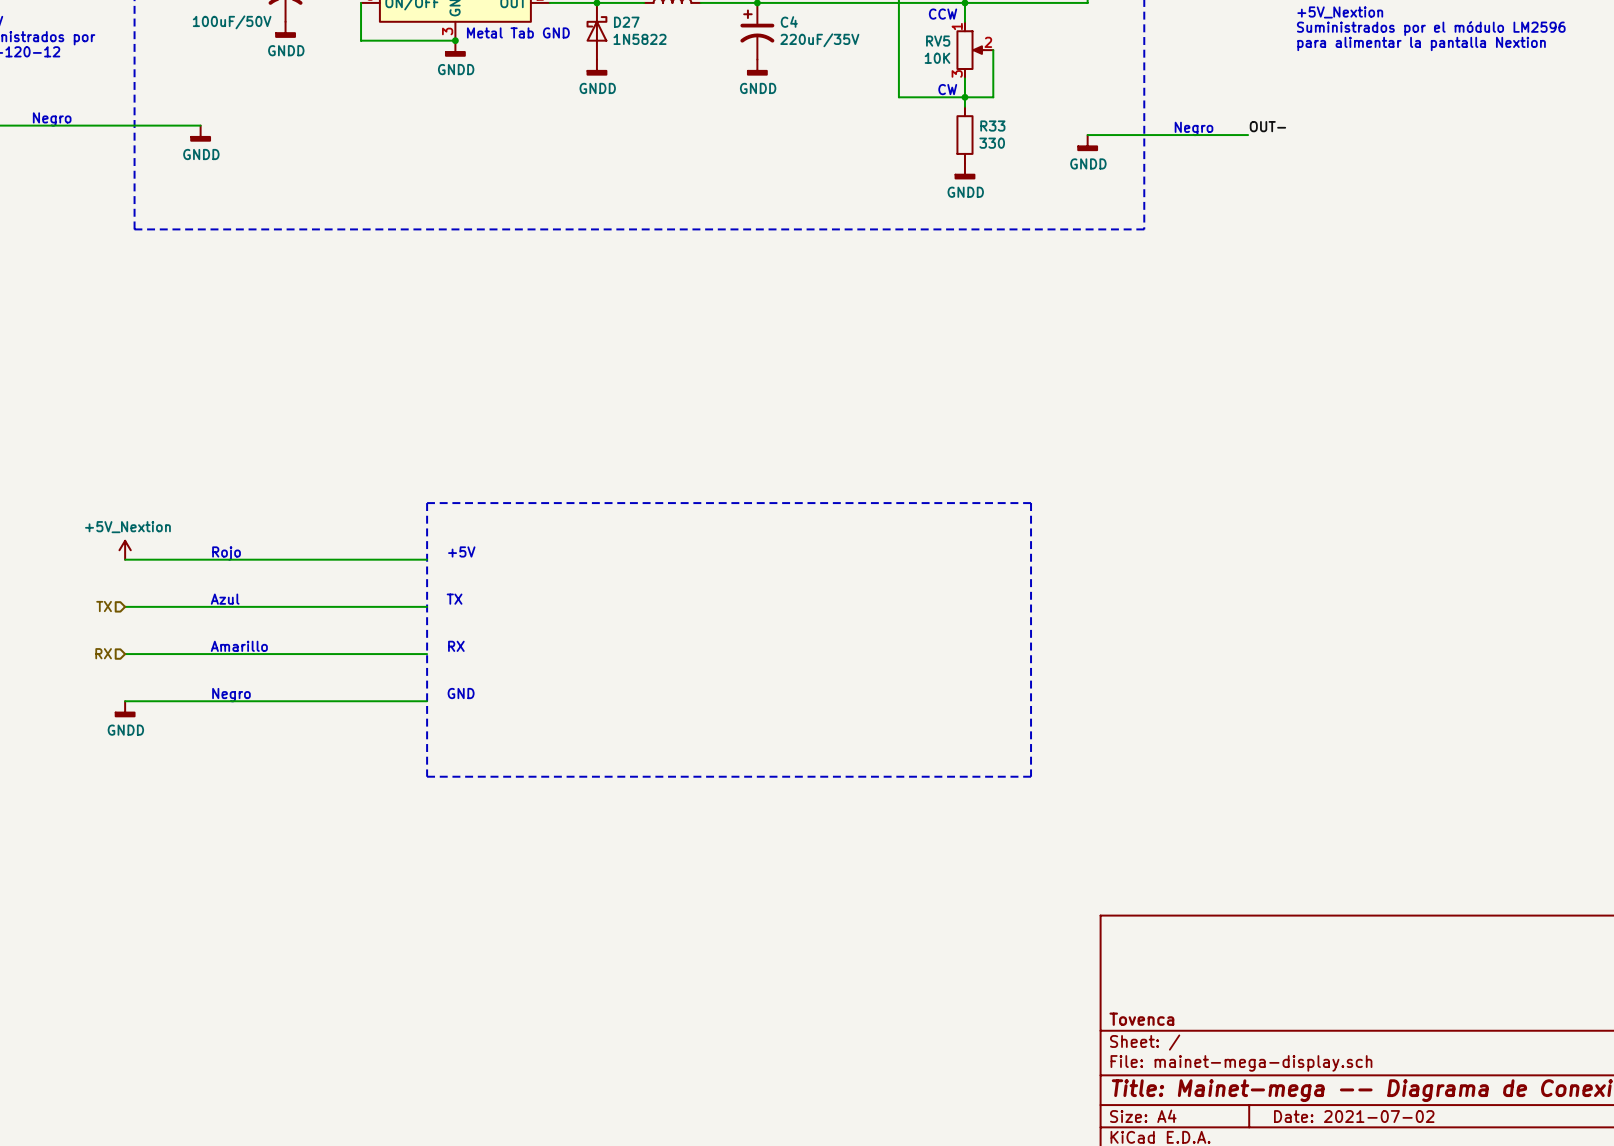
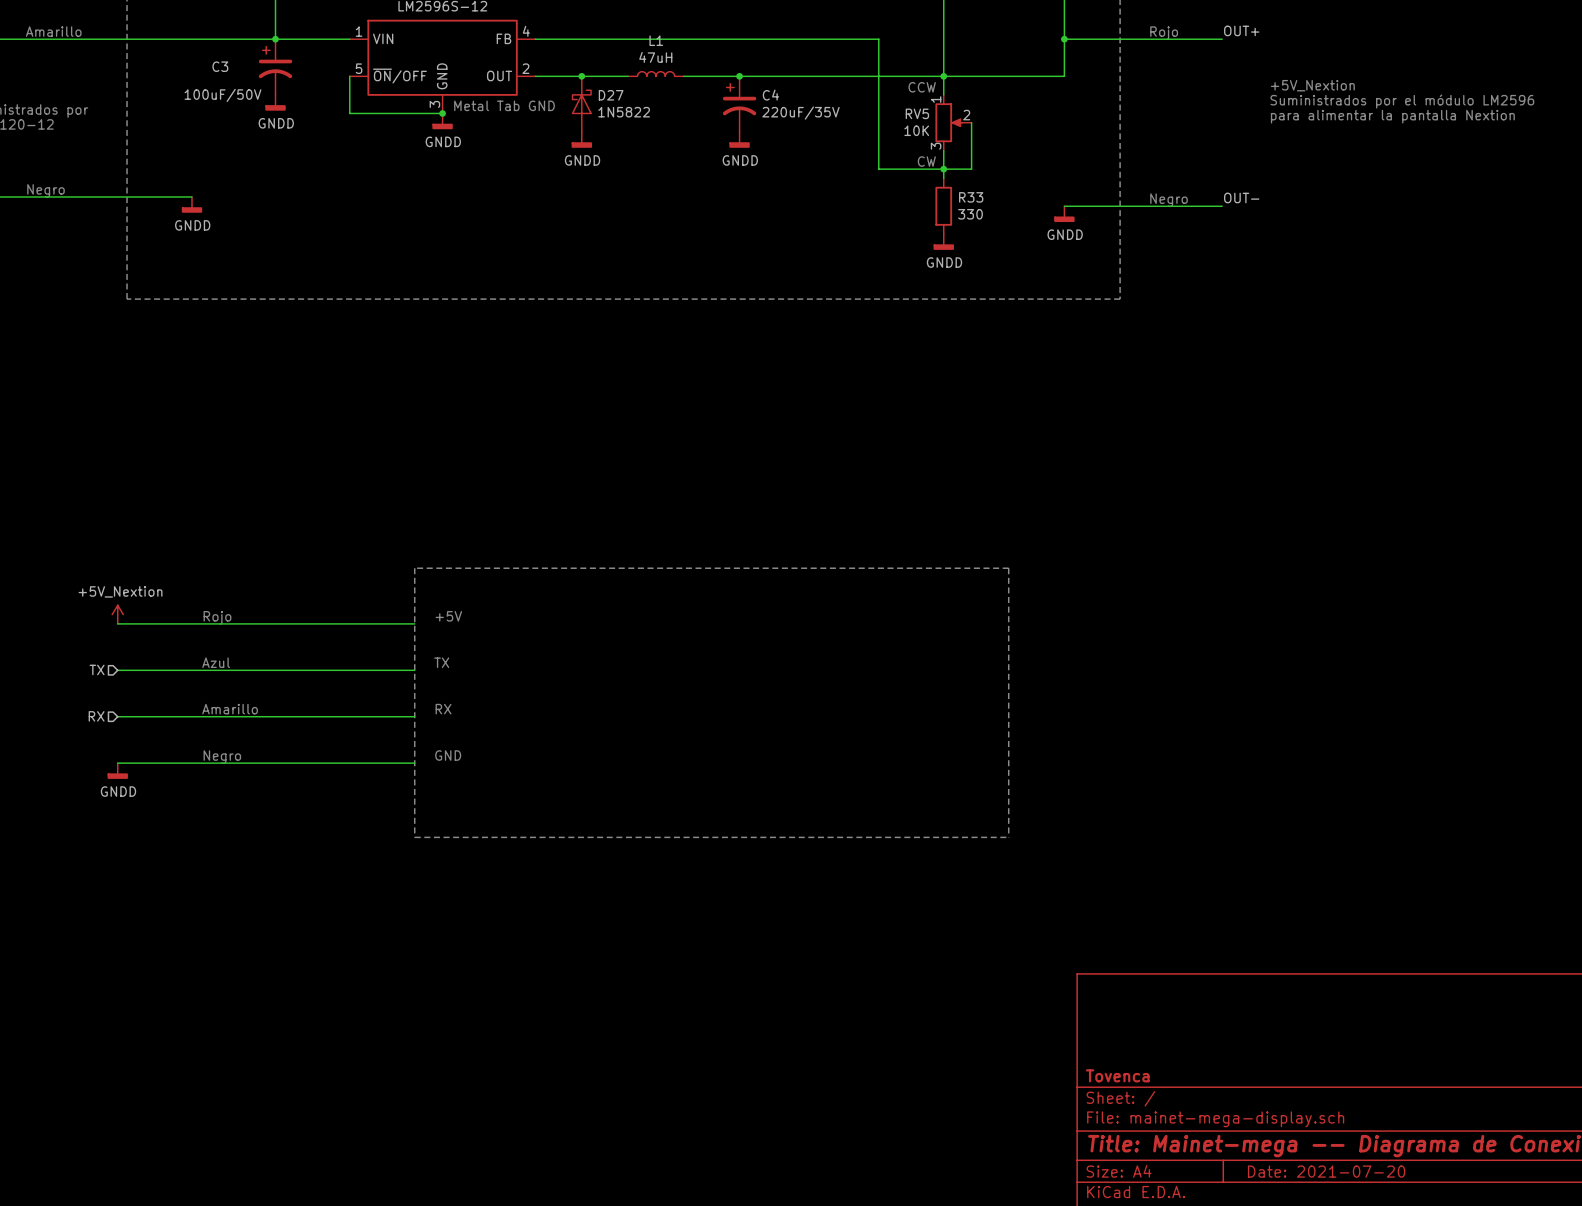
title block: Date: 2021-07-02 (1354, 1116) -> Date: 2021-07-20 (1326, 1171)

